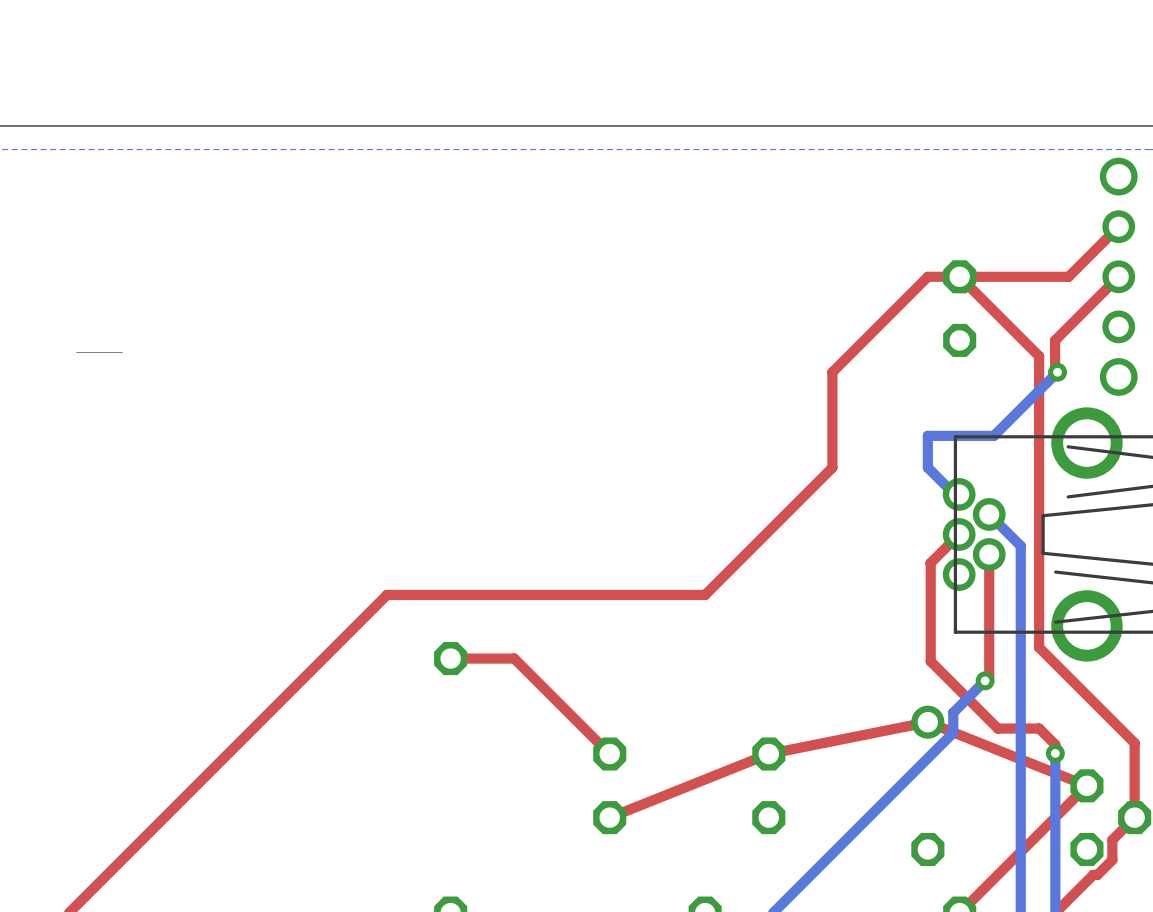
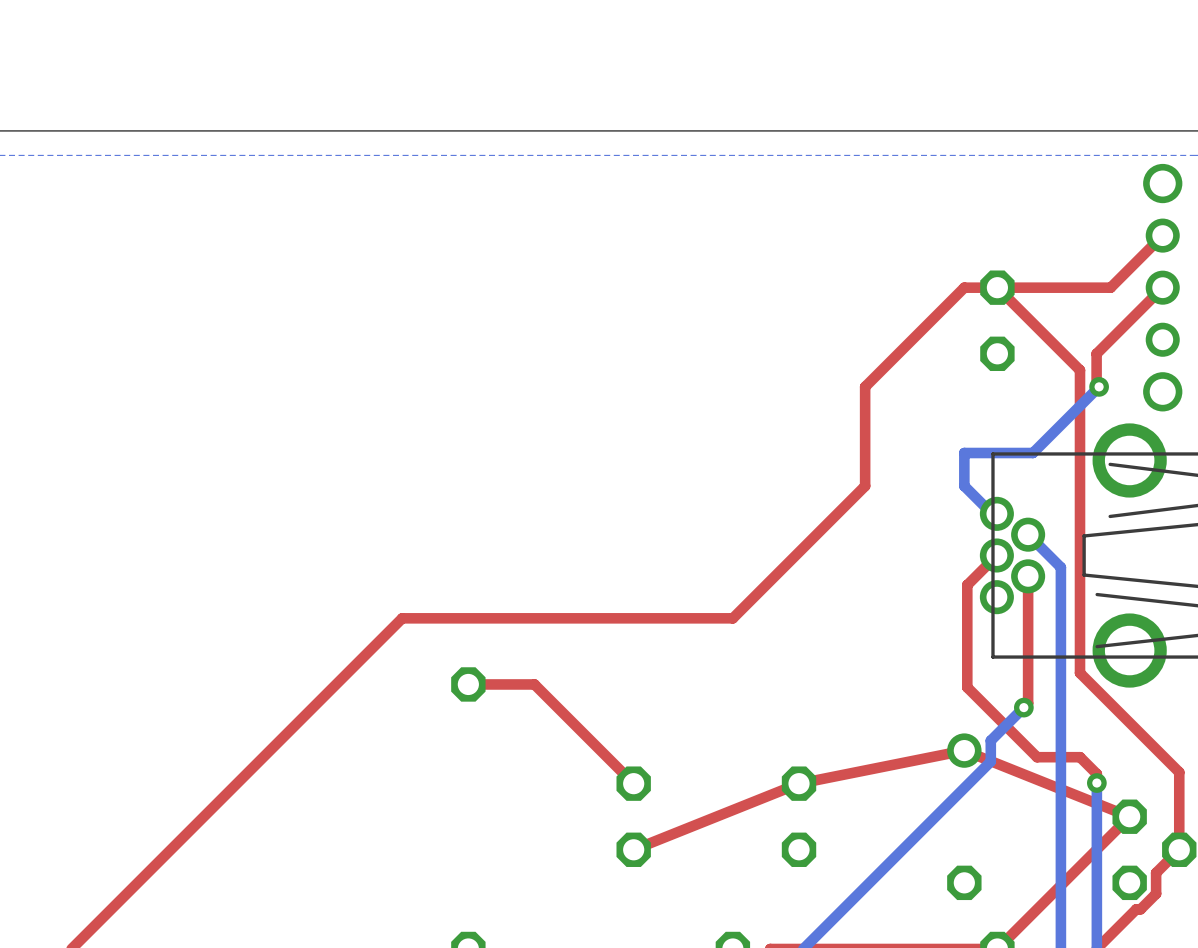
drawing: [76, 352, 123, 353] -> none

